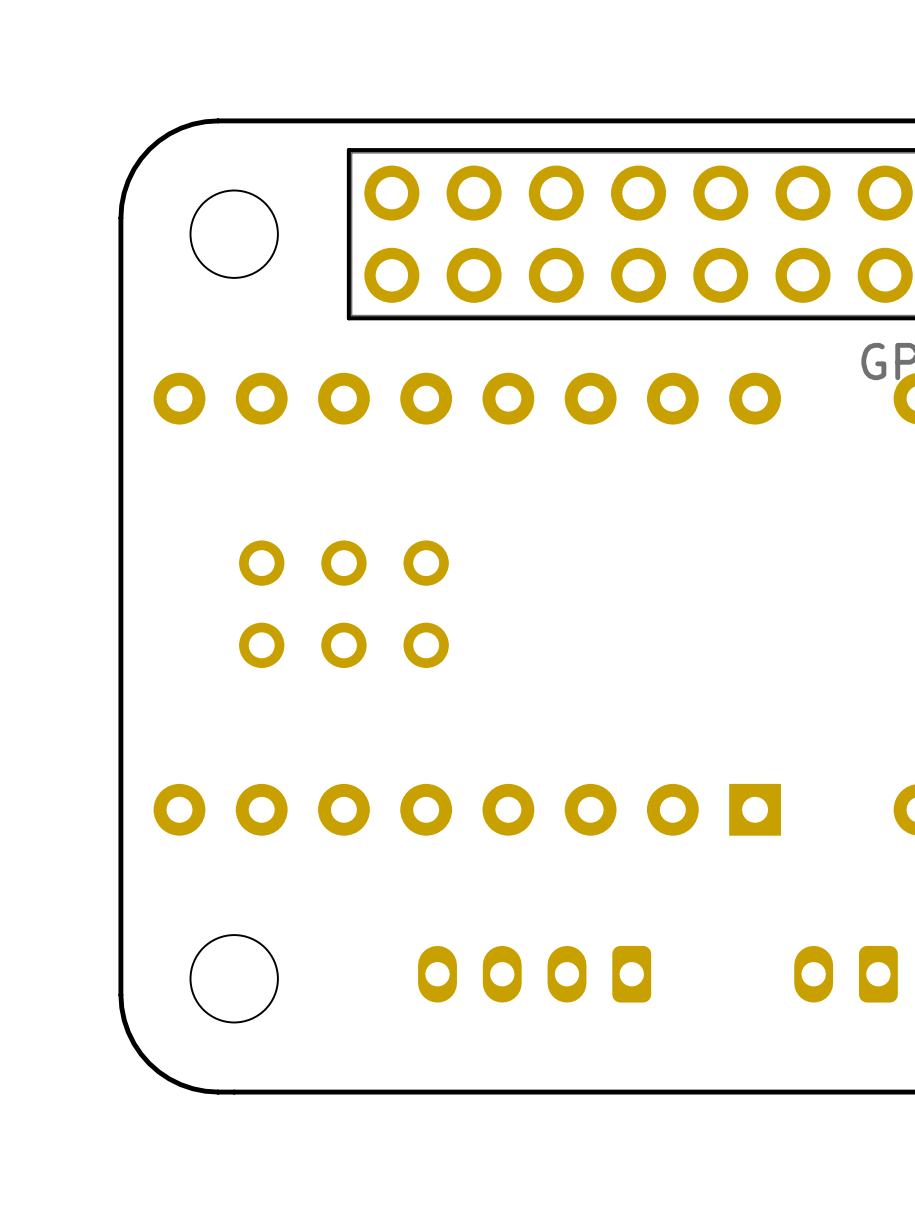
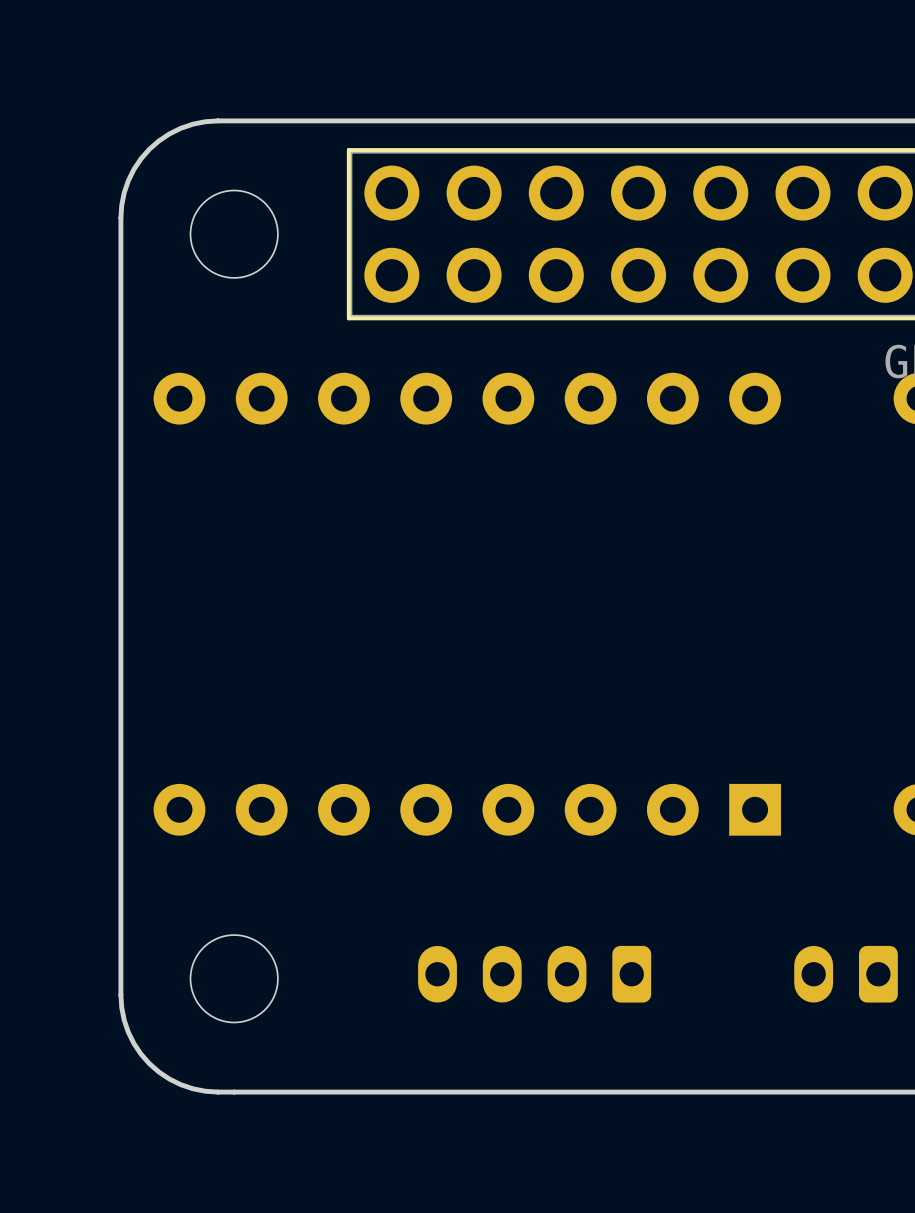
part: (261, 604) -> none
part: (343, 604) -> none
part: (426, 604) -> none

